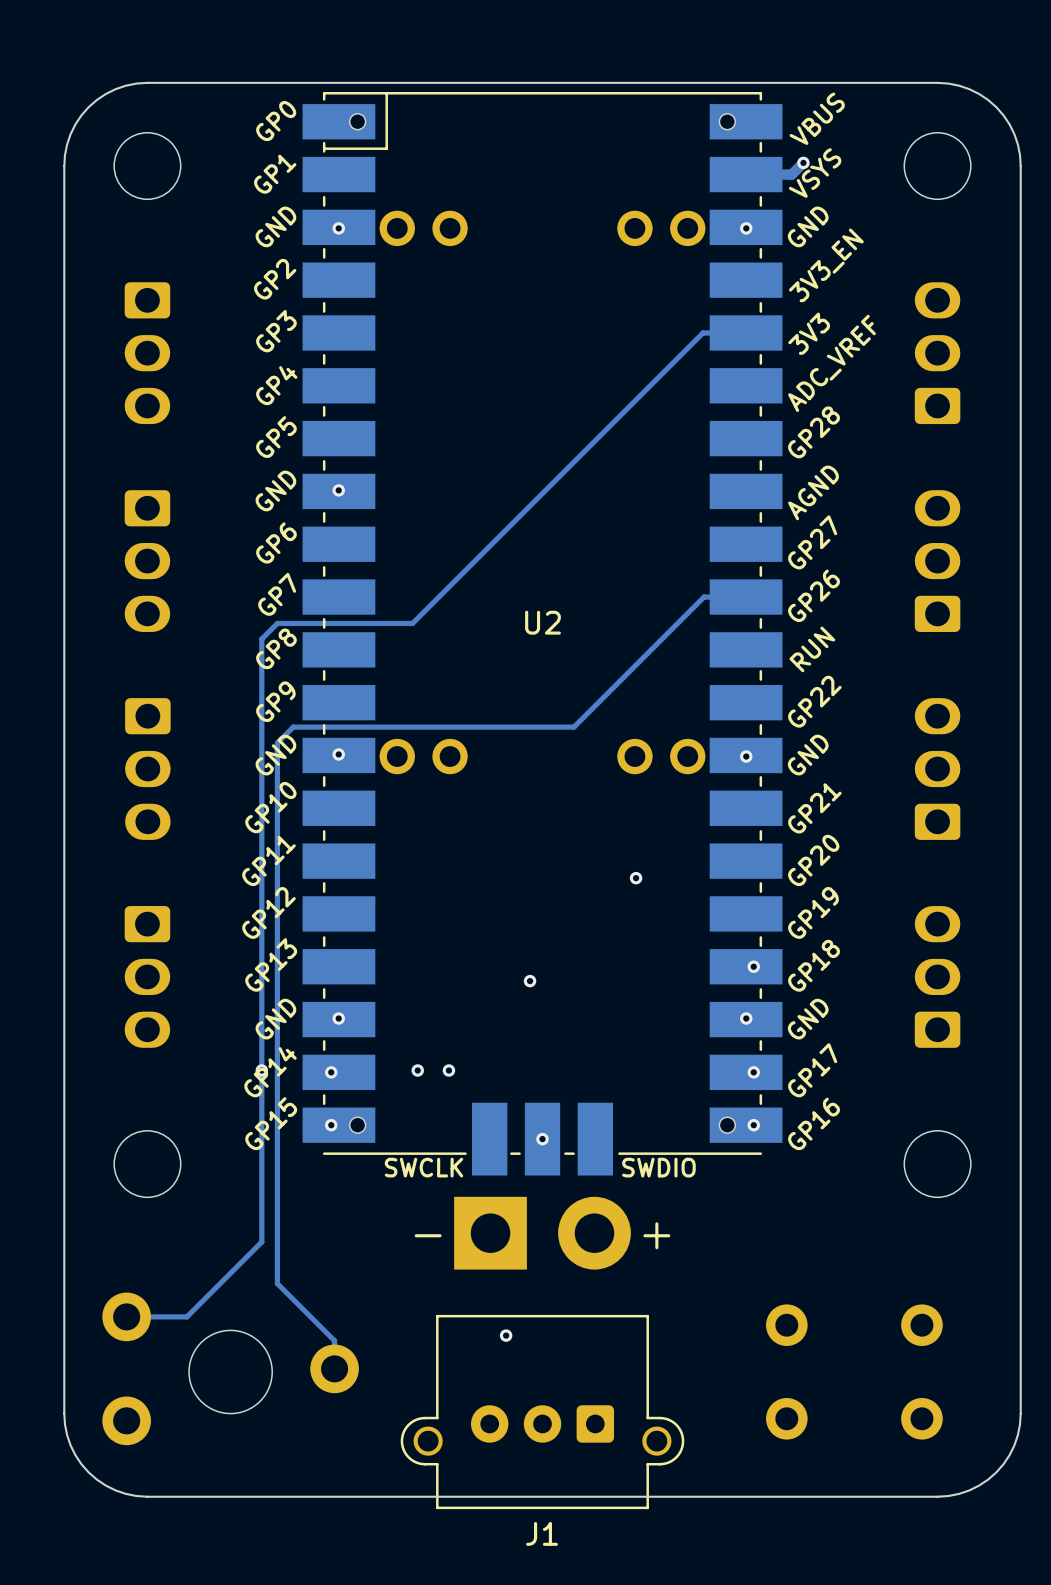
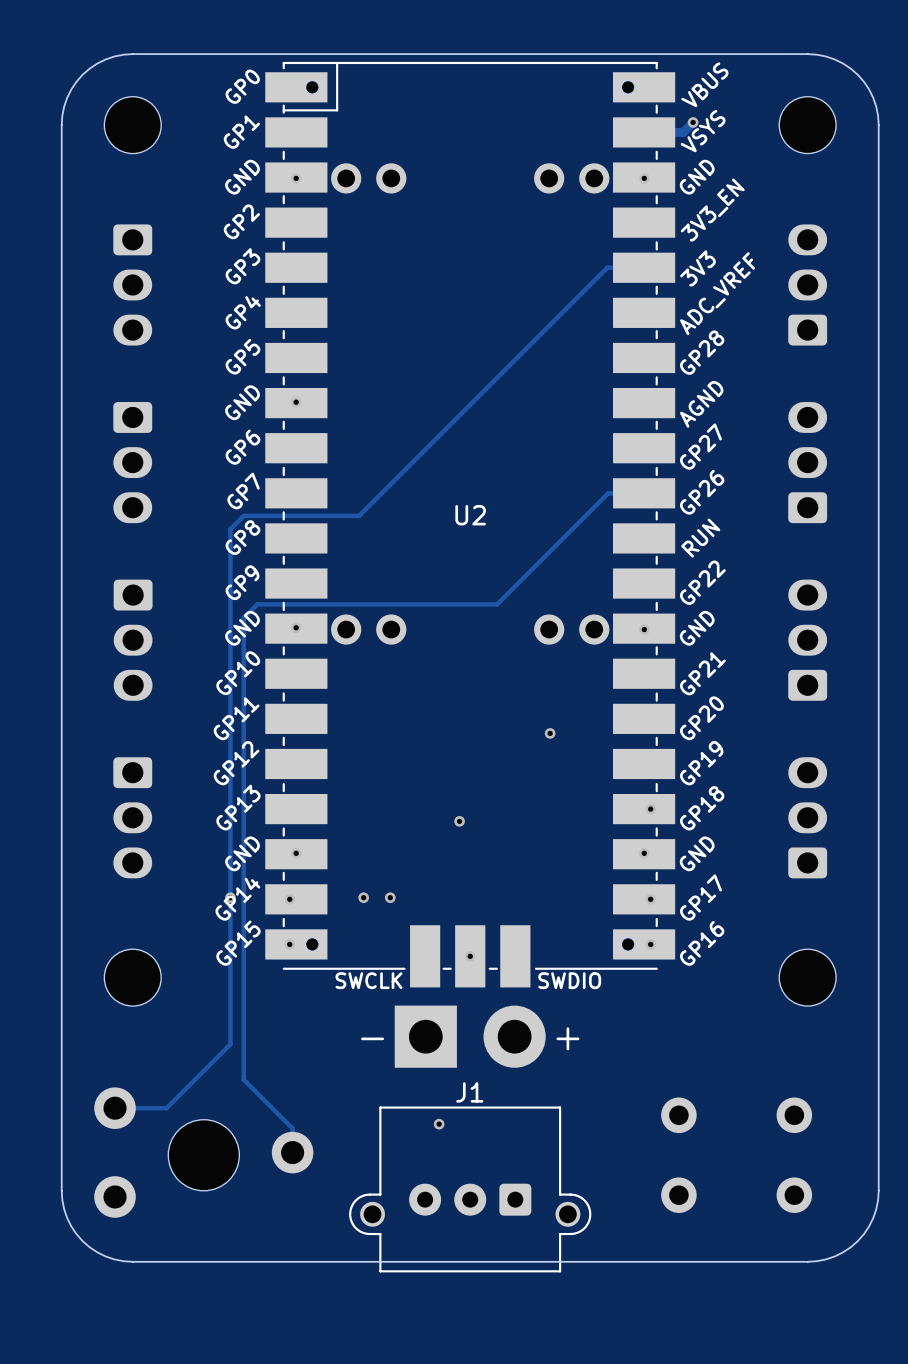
J1 name position: J1 (542, 1533) -> J1 (469, 1092)

